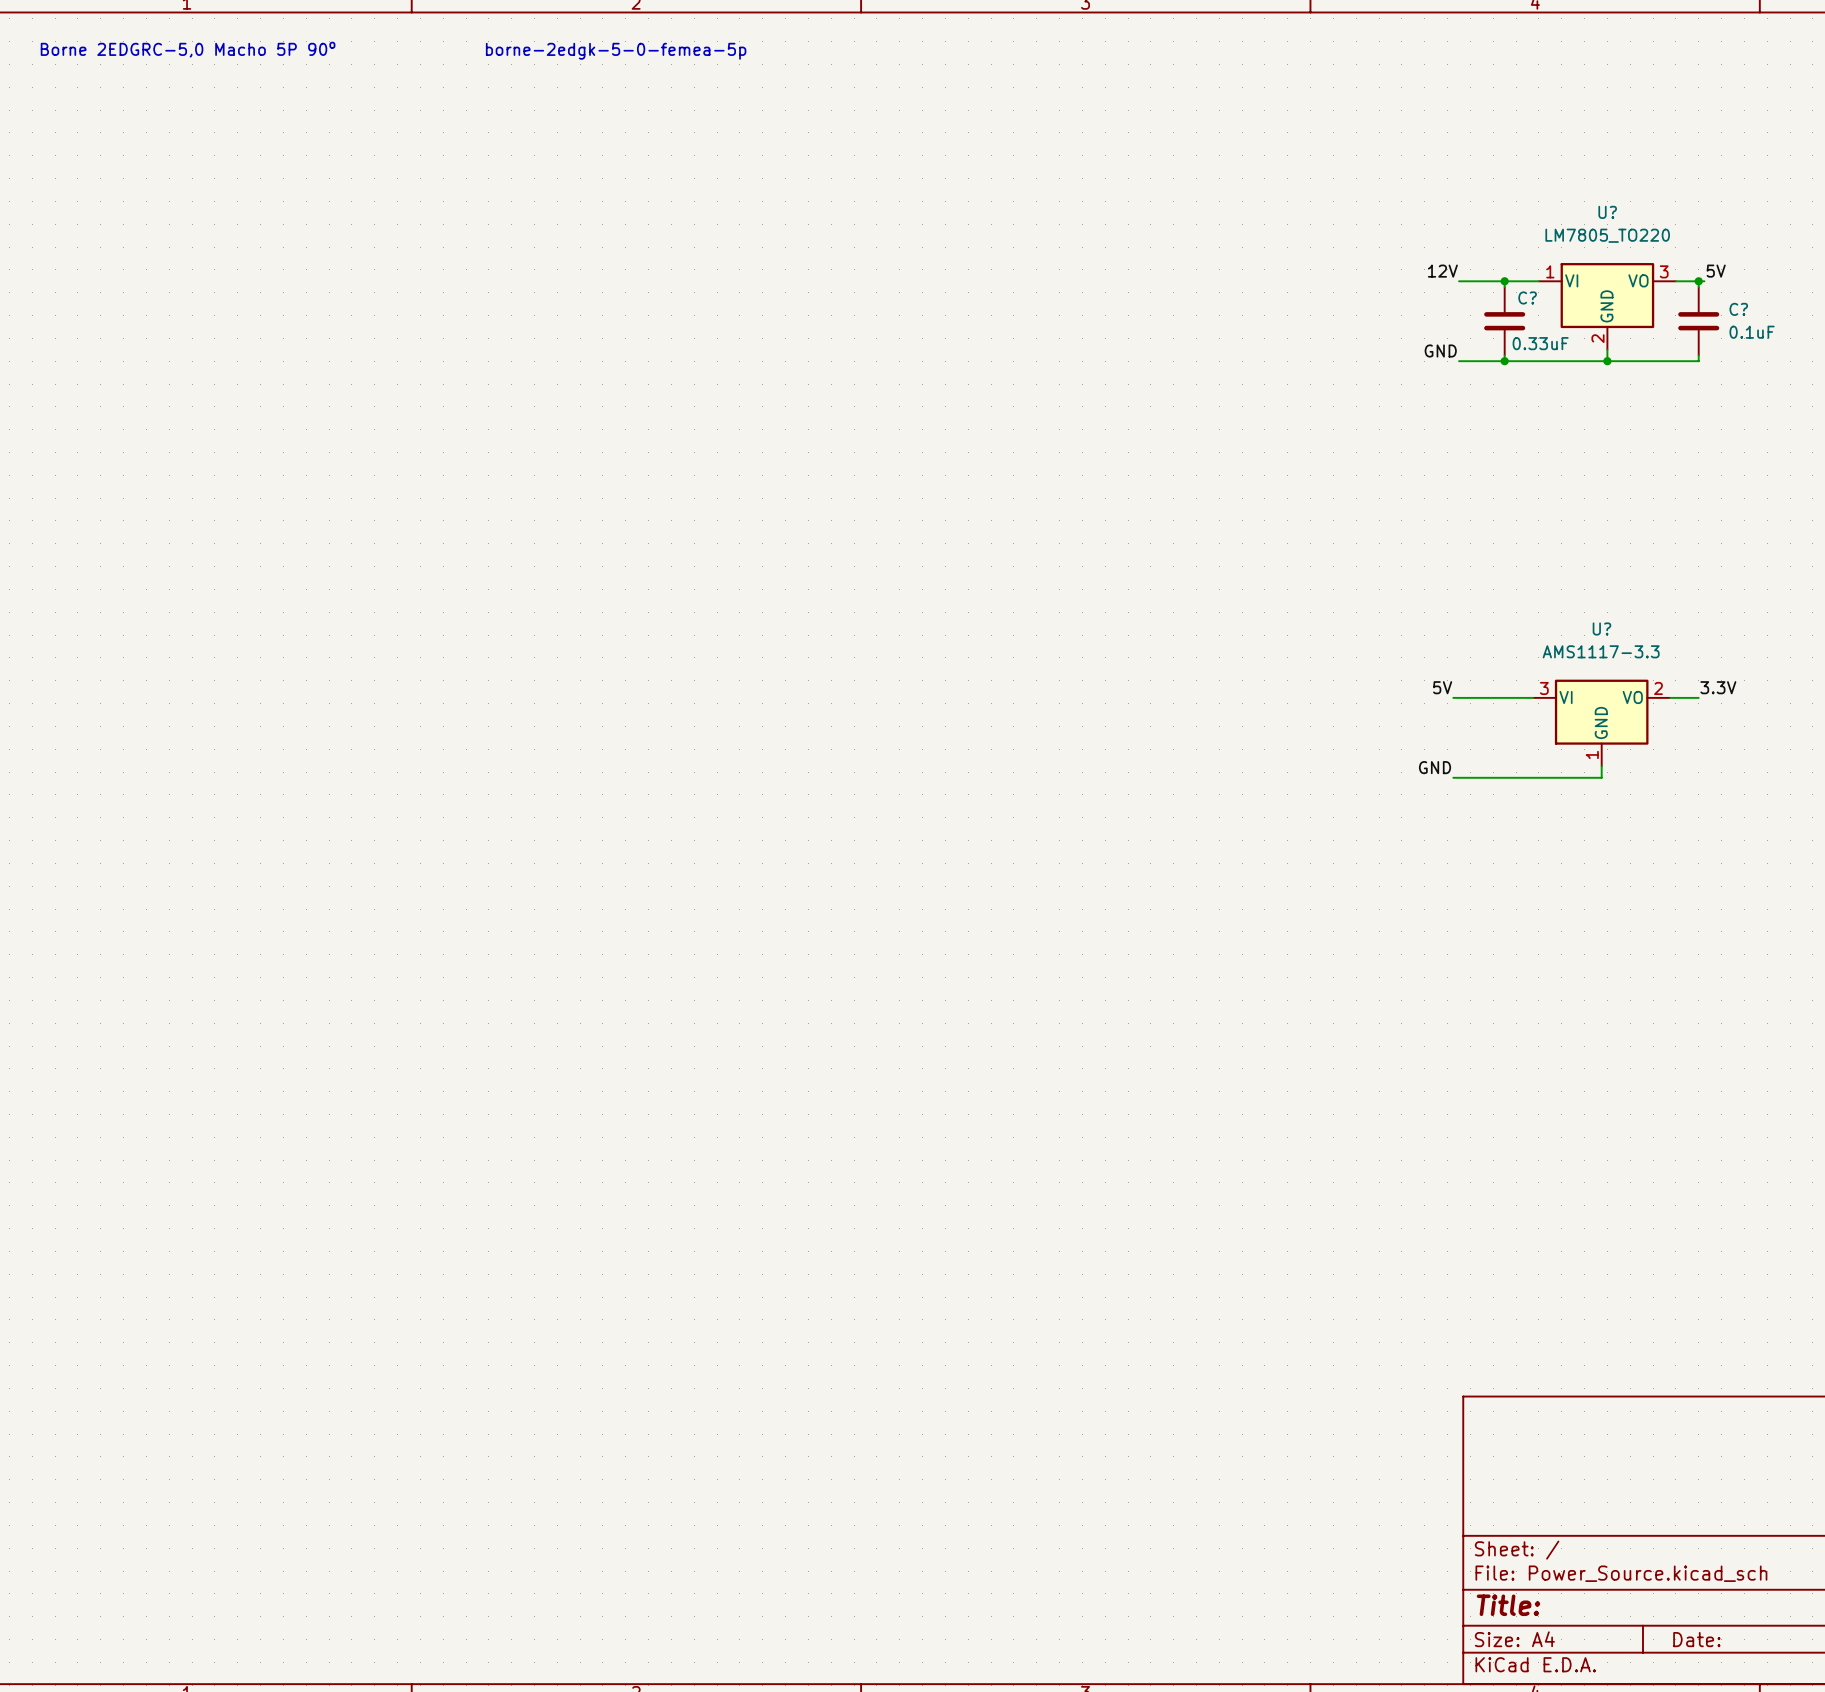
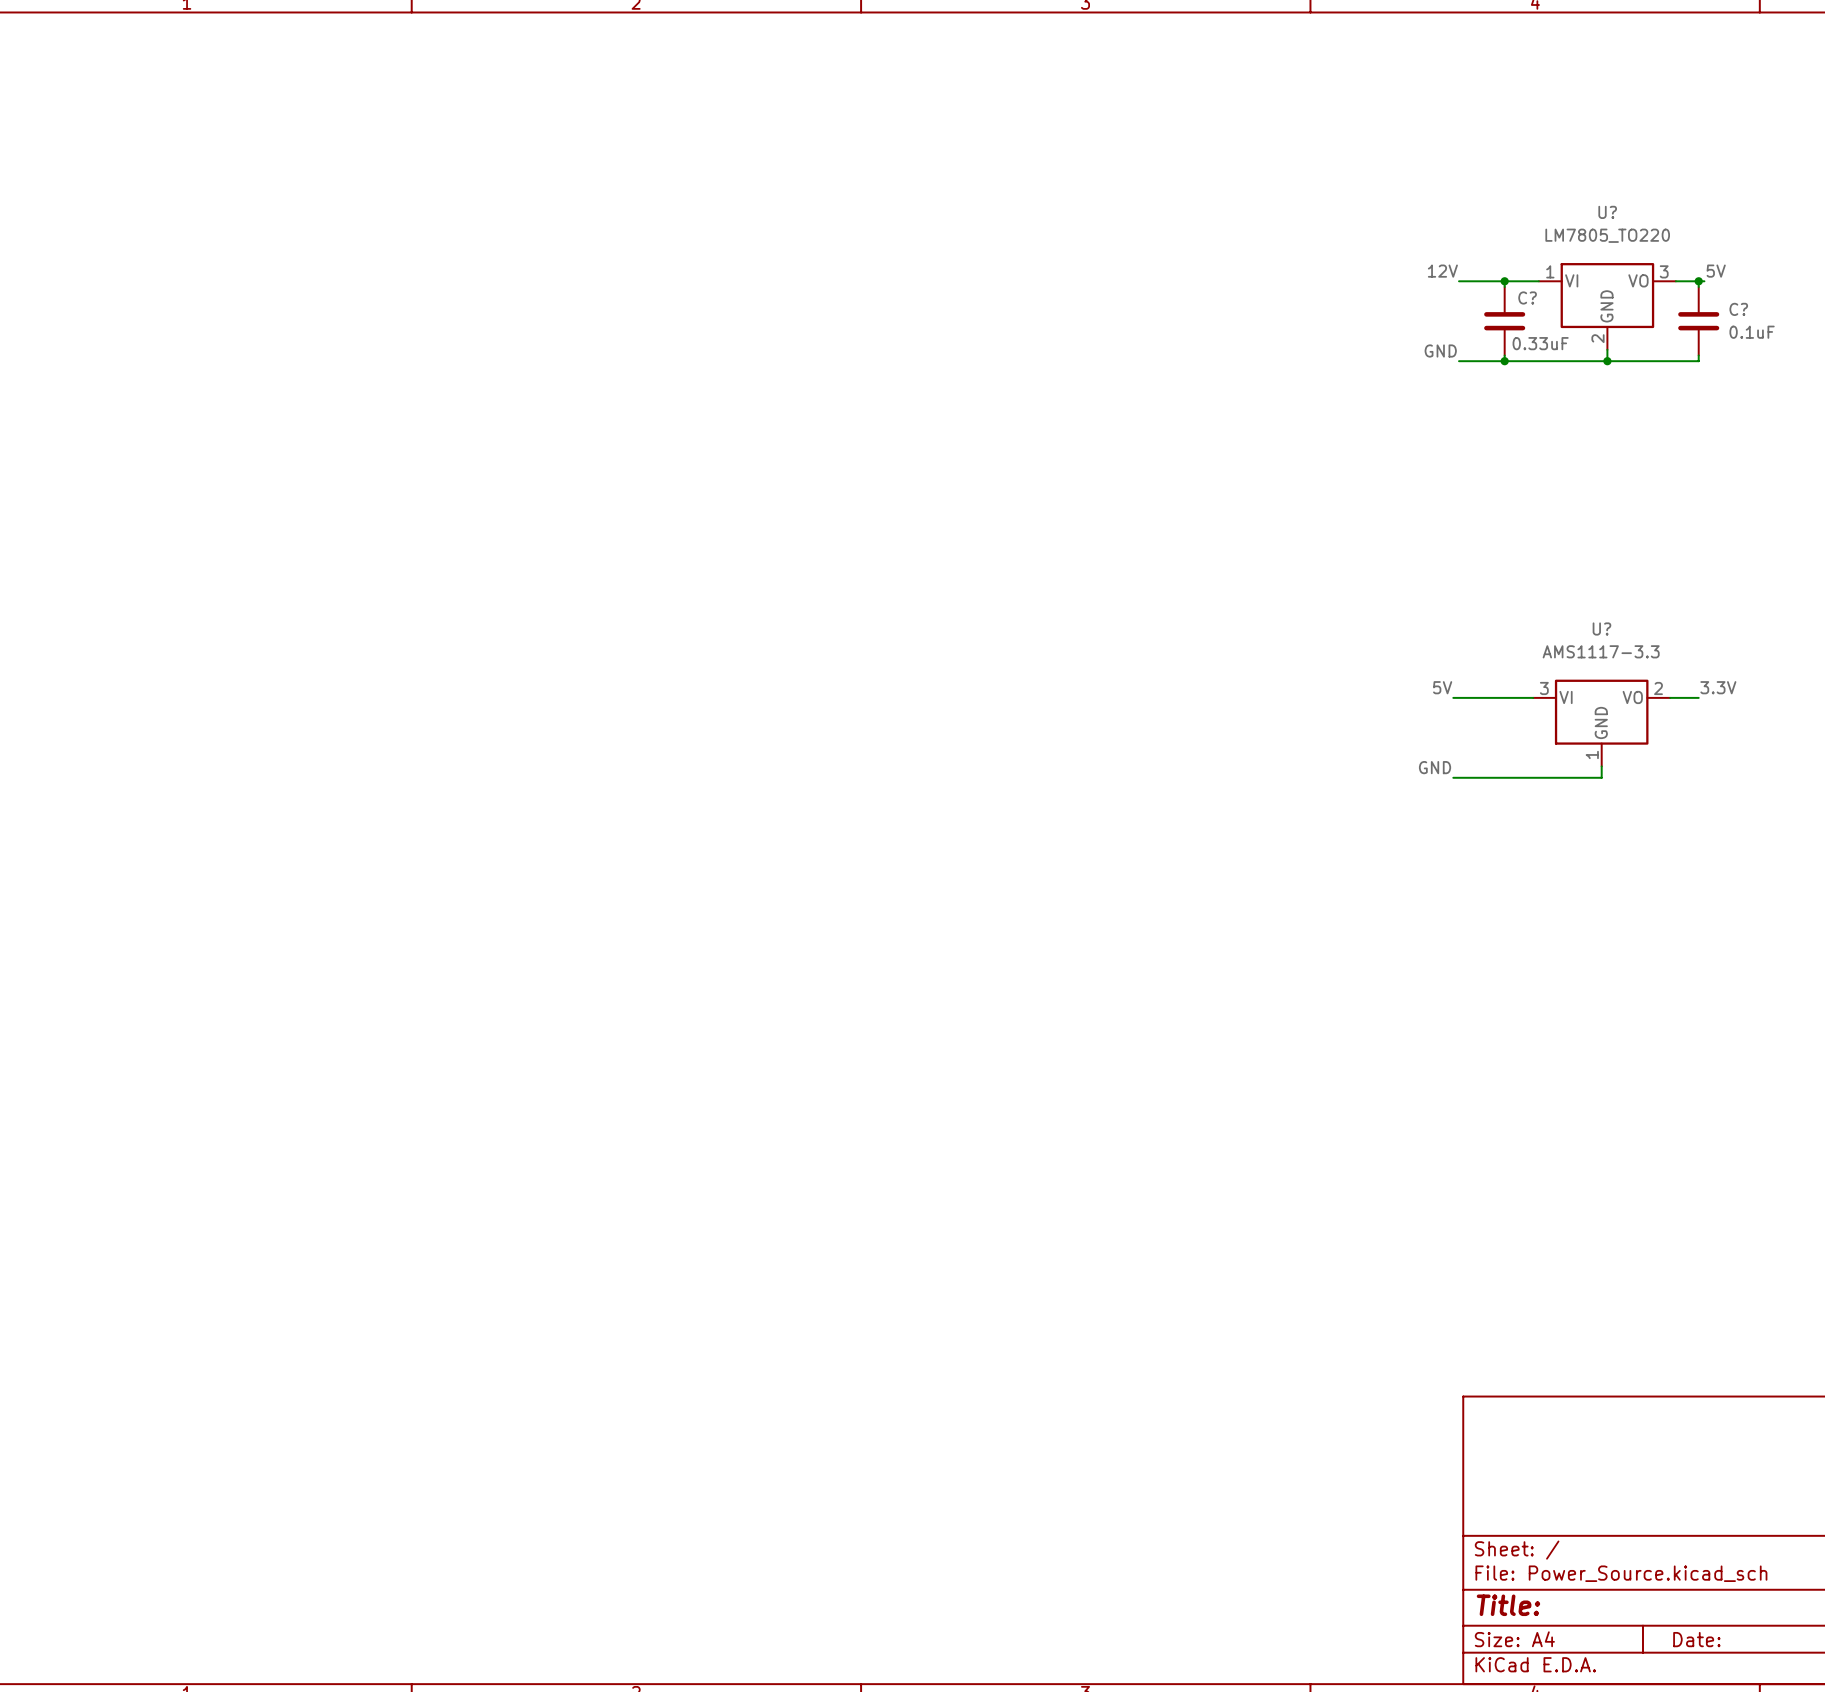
text: Borne 2EDGRC-5,0 Macho 5P 90º (188, 49) -> none
text: borne-2edgk-5-0-femea-5p (616, 51) -> none

